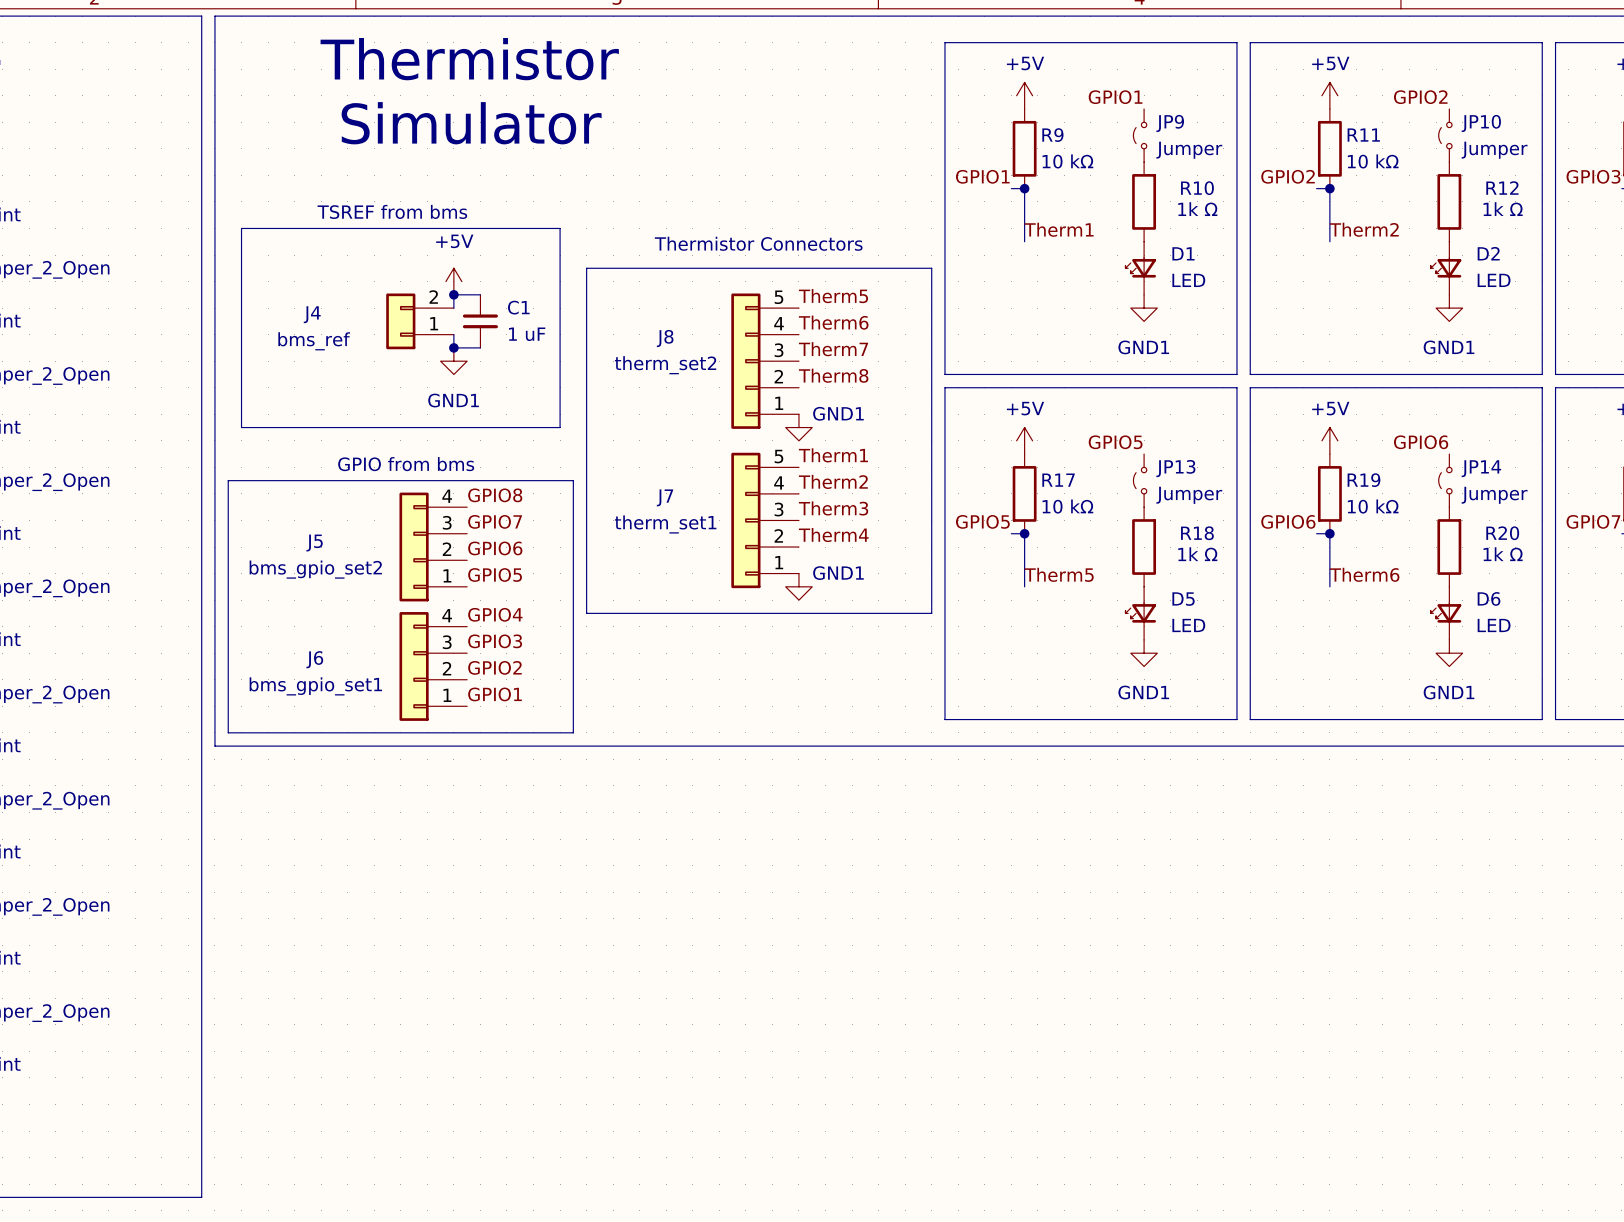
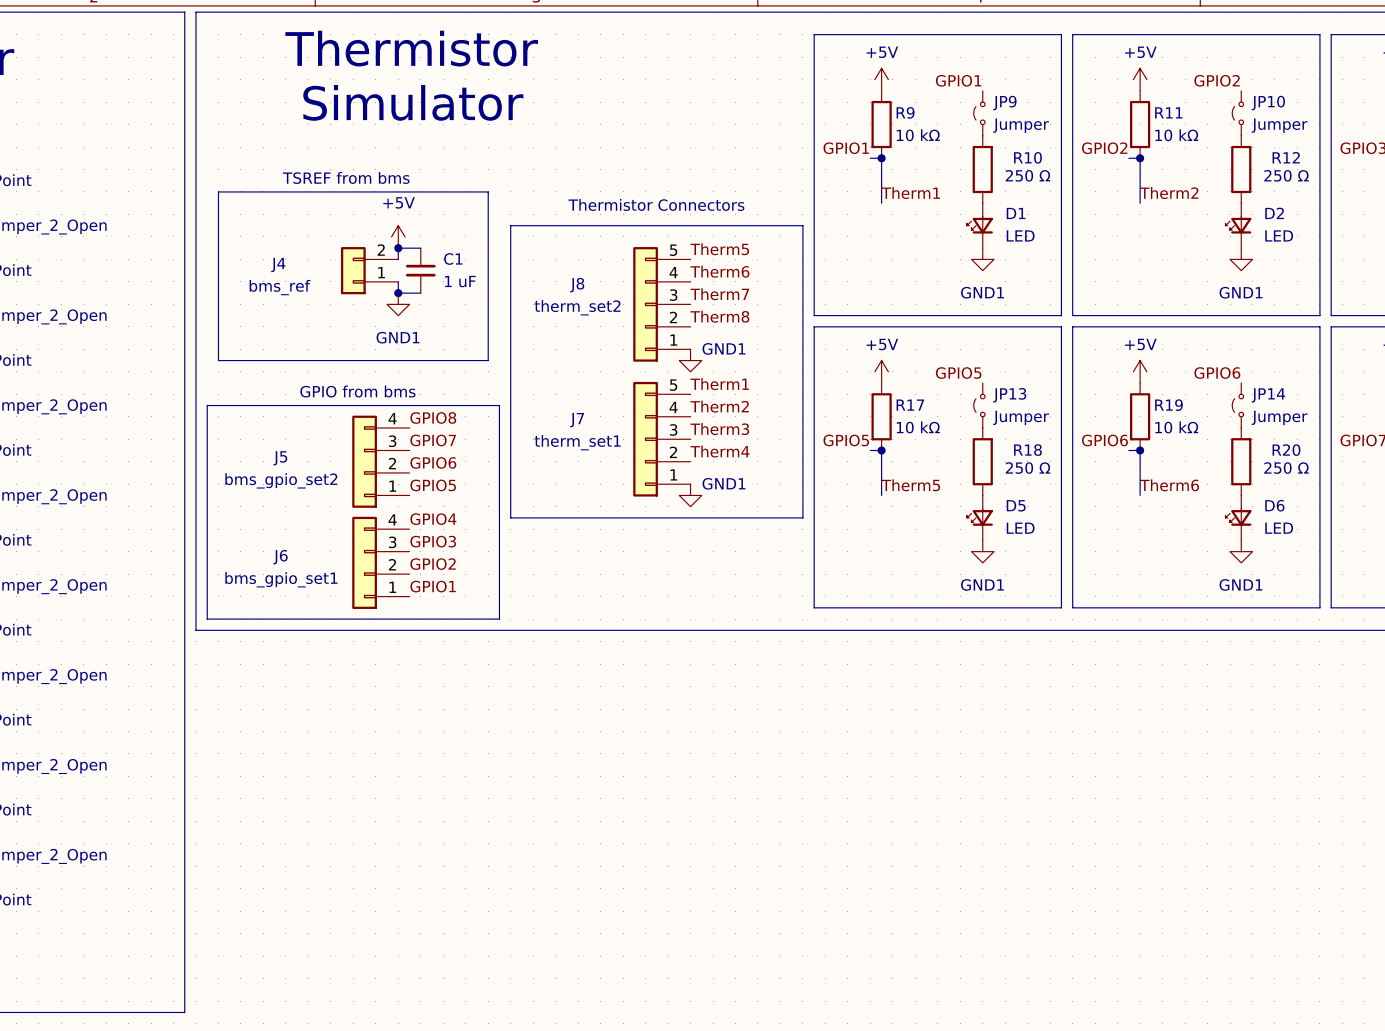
R10 value: 1k Ω (1197, 209) -> 250 Ω (1027, 175)
R12 value: 1k Ω (1503, 209) -> 250 Ω (1286, 175)
R18 value: 1k Ω (1197, 554) -> 250 Ω (1027, 468)
R20 value: 1k Ω (1503, 554) -> 250 Ω (1286, 468)

